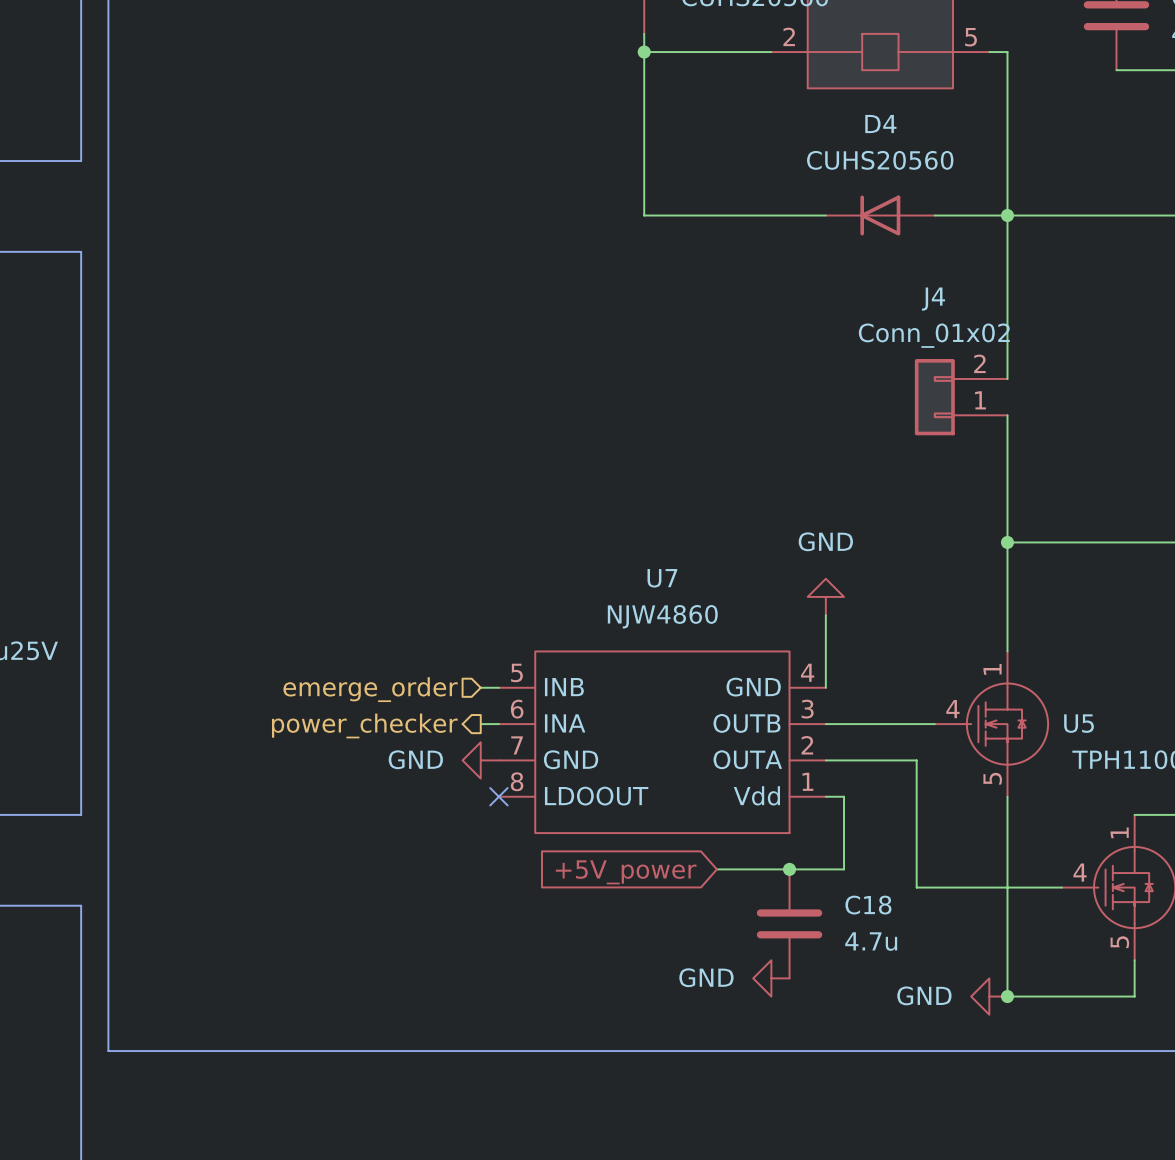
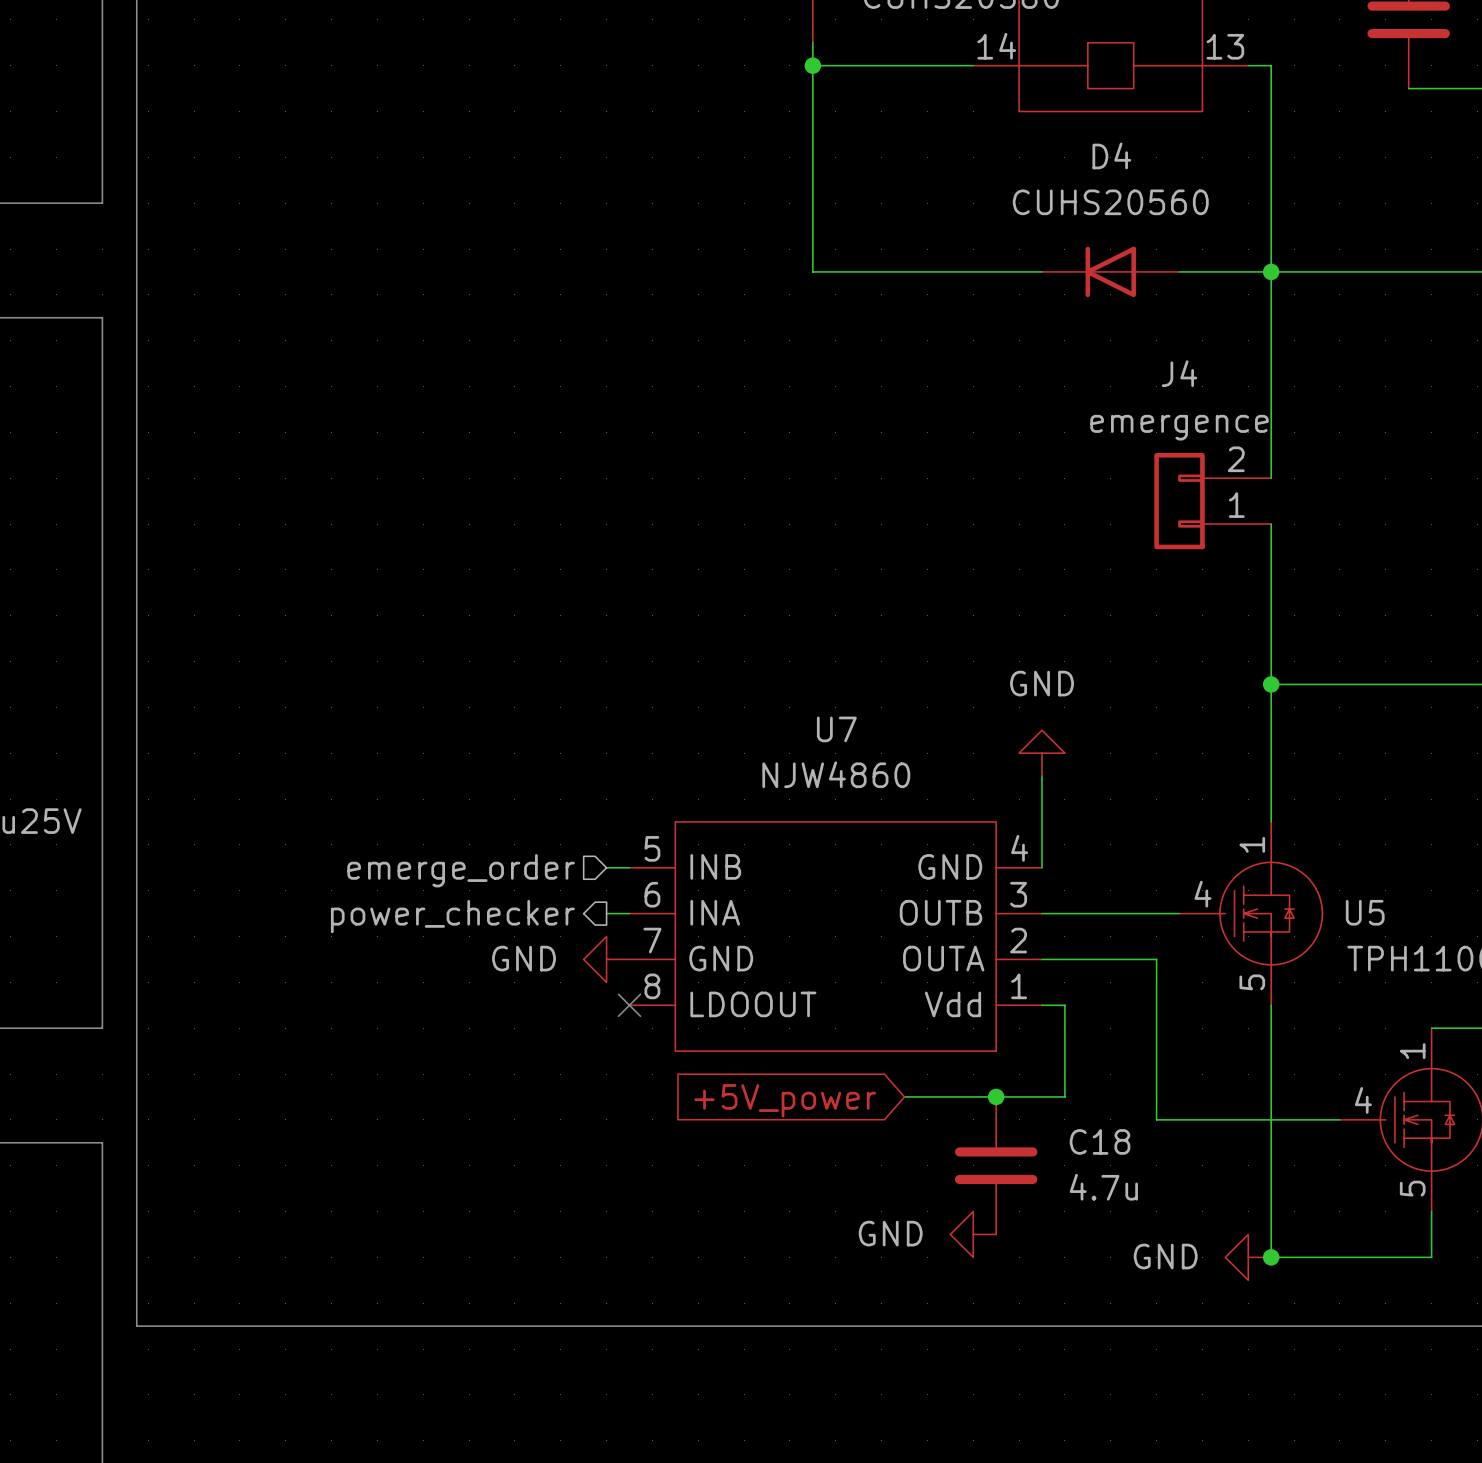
part pin number: 2 (789, 36) -> 14 (996, 46)
part pin number: 5 (971, 37) -> 13 (1225, 46)
J4 value: Conn_01x02 (934, 335) -> emergence (1179, 427)

